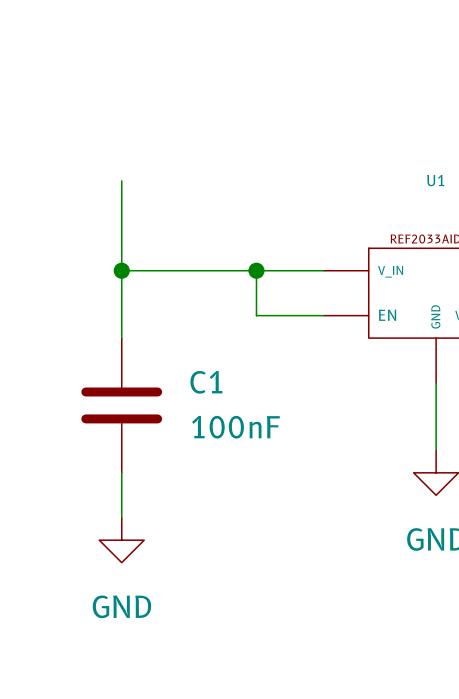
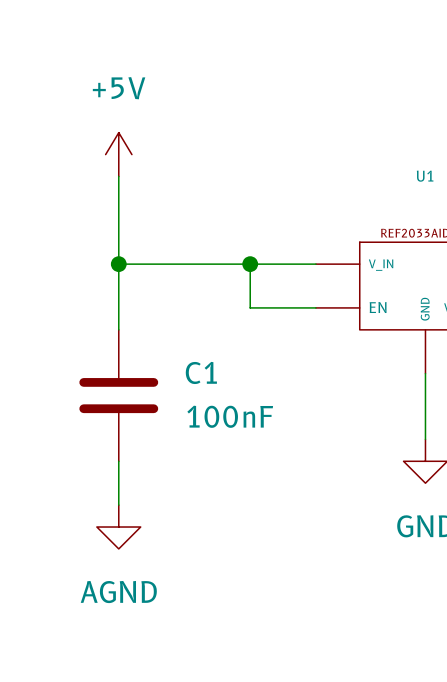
power symbol: none -> +5V (118, 154)
power symbol: GND (121, 540) -> AGND (118, 527)

